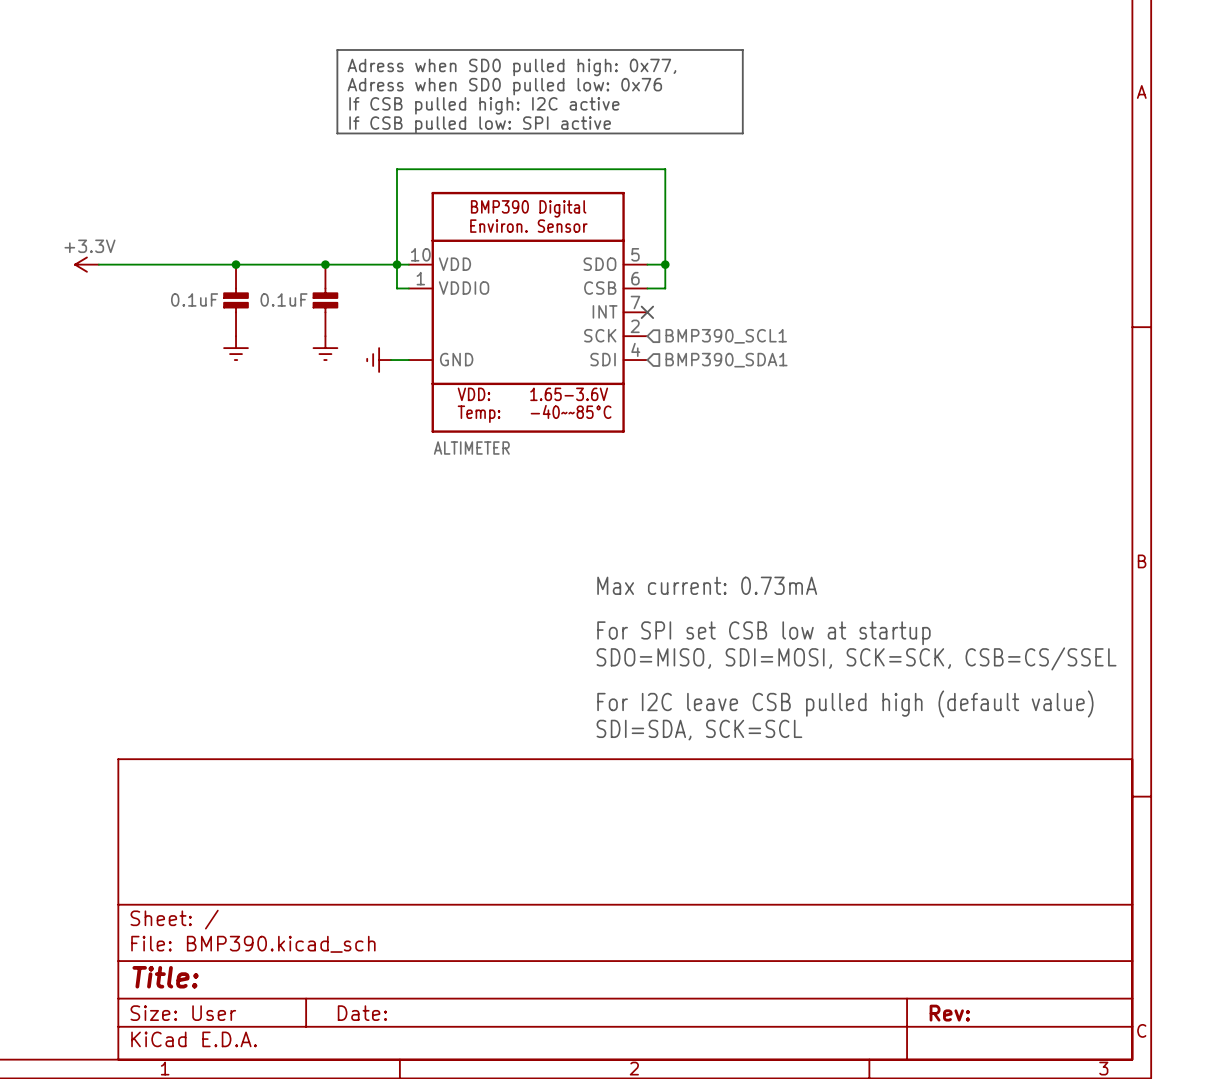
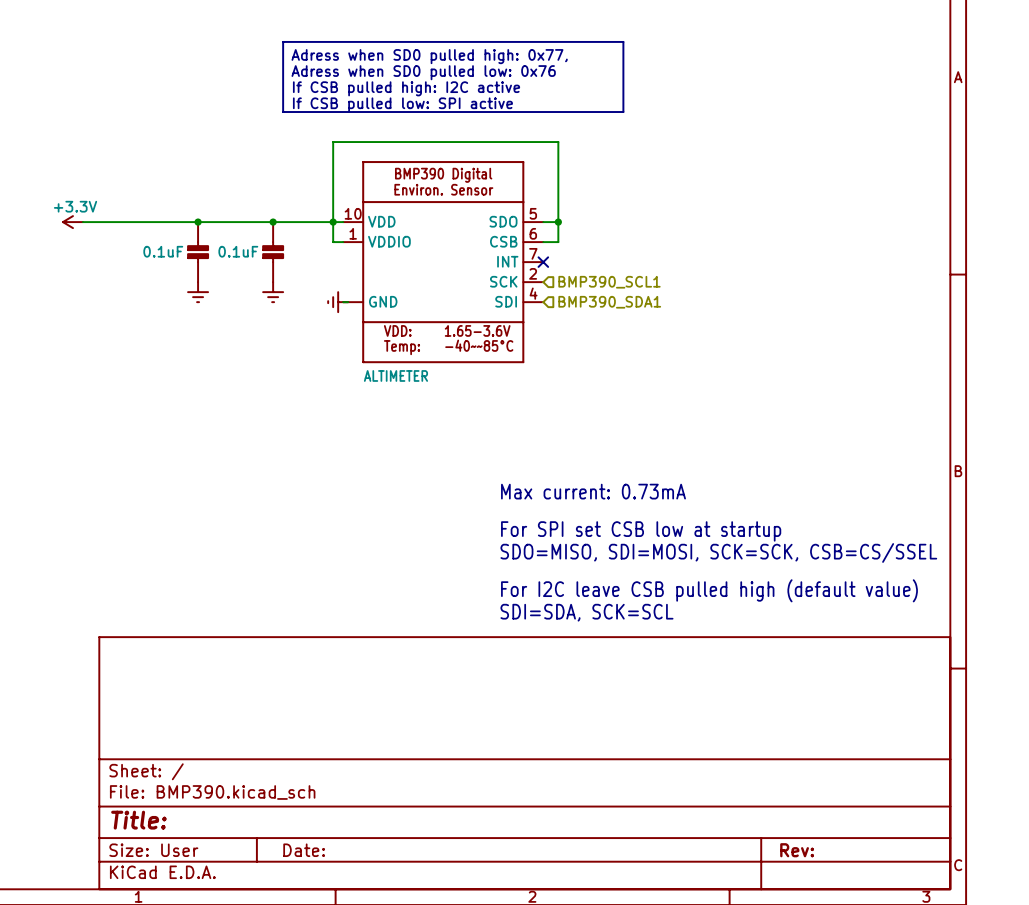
power symbol position: (379, 360) -> (338, 302)

